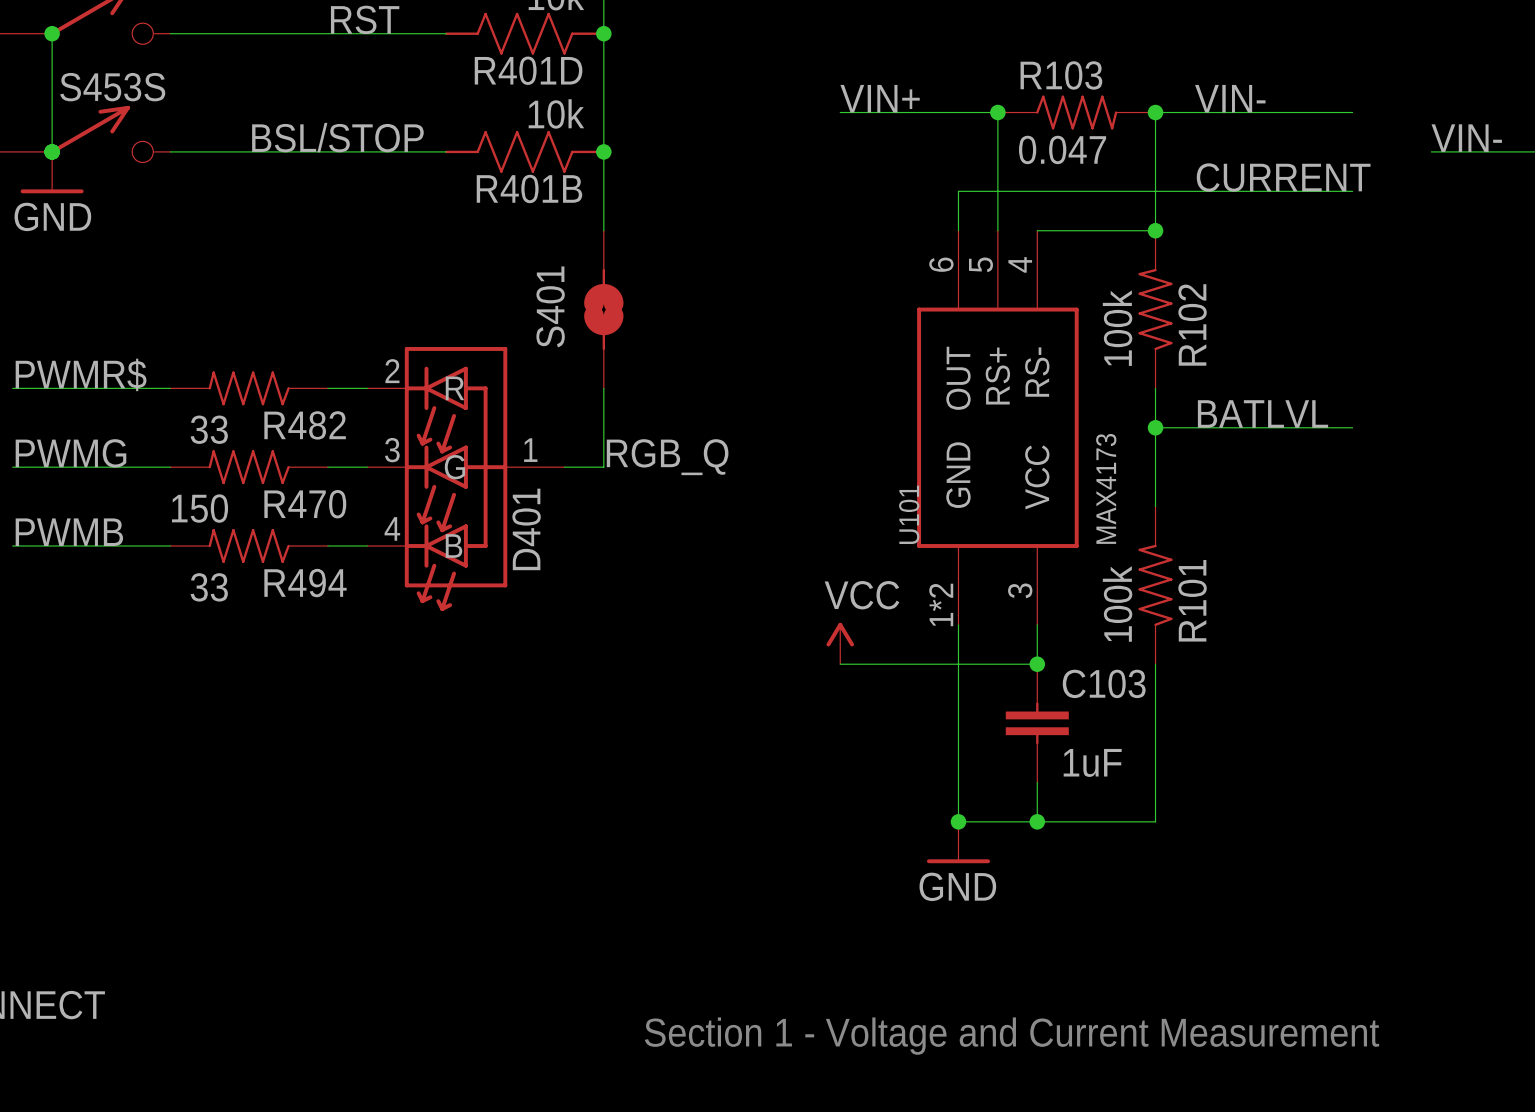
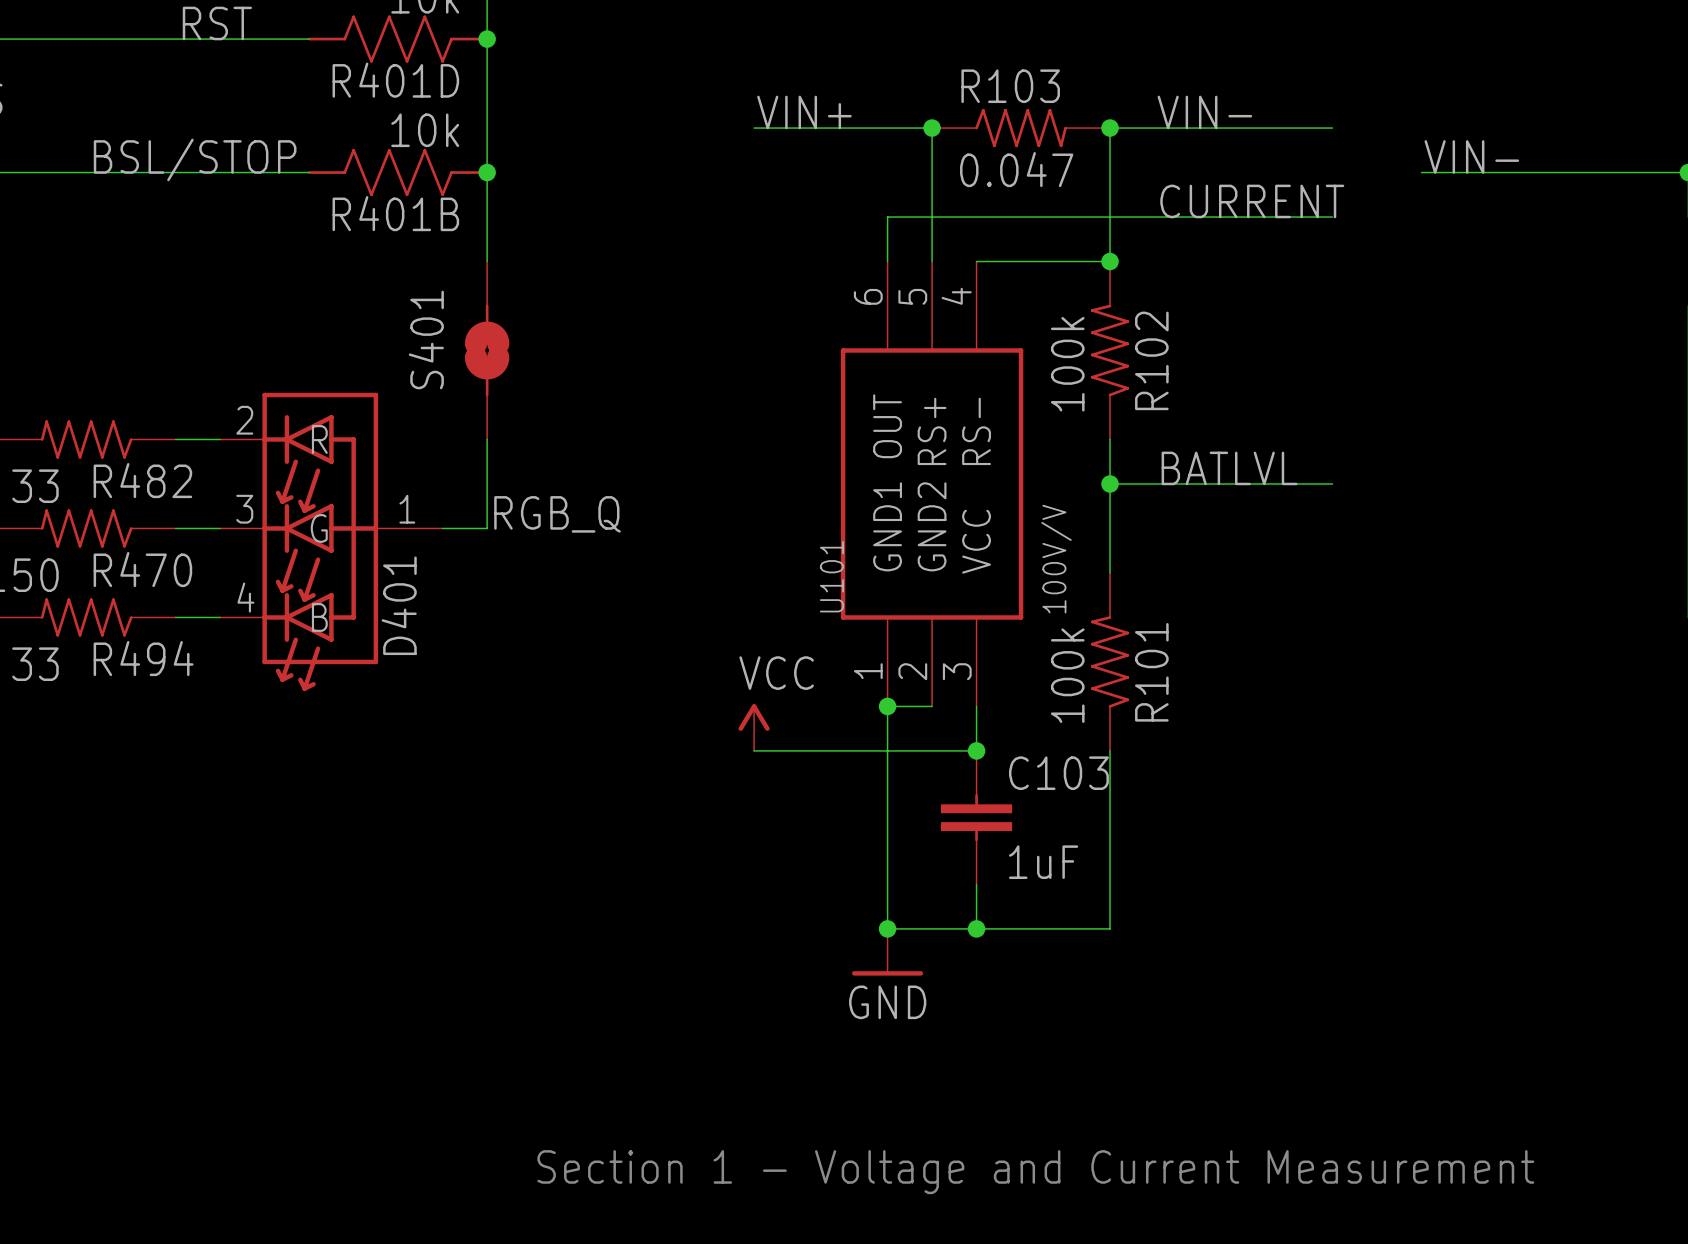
U101 symbol: [917, 230, 1079, 625] -> [840, 261, 1024, 707]
U101 value: MAX4173 (1106, 488) -> 100V/V (1056, 559)
wire: none -> (887, 706) (932, 706)
junction: none -> (887, 706)

